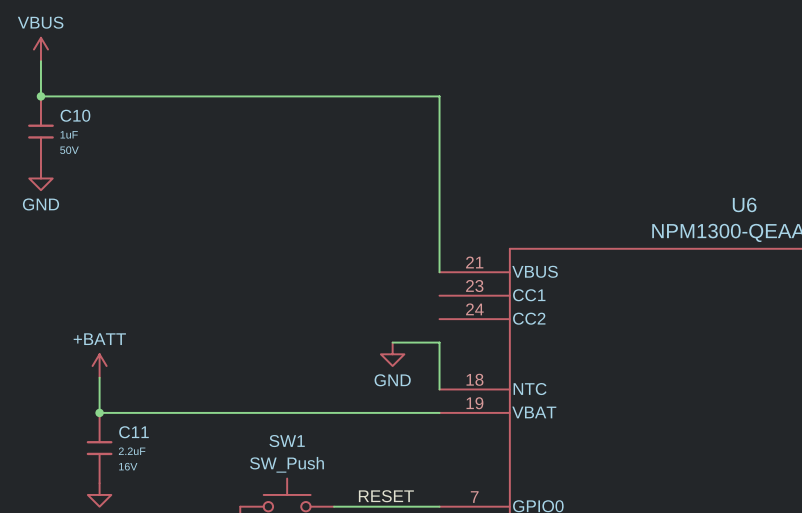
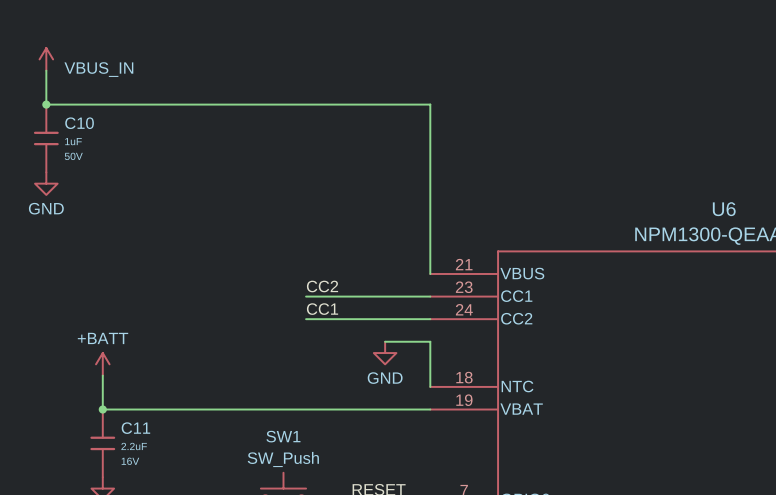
power symbol: VBUS (40, 49) -> VBUS_IN (46, 59)
label: none -> CC2 (322, 286)
wire: none -> (306, 296) (430, 296)
label: none -> CC1 (322, 309)
wire: none -> (306, 319) (430, 319)

